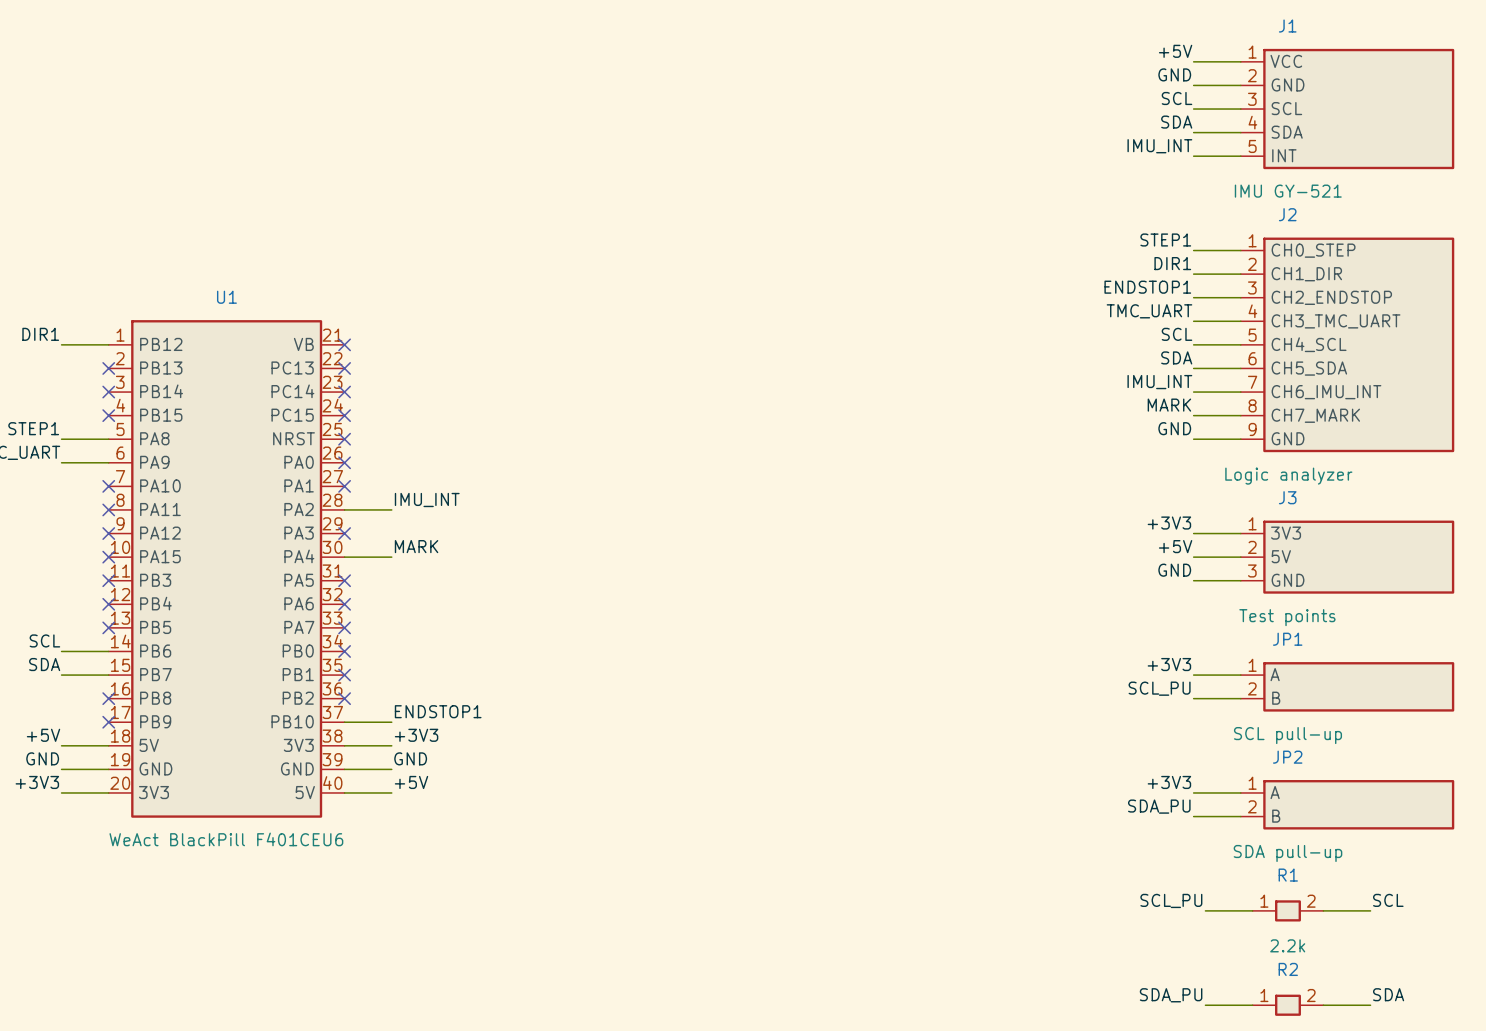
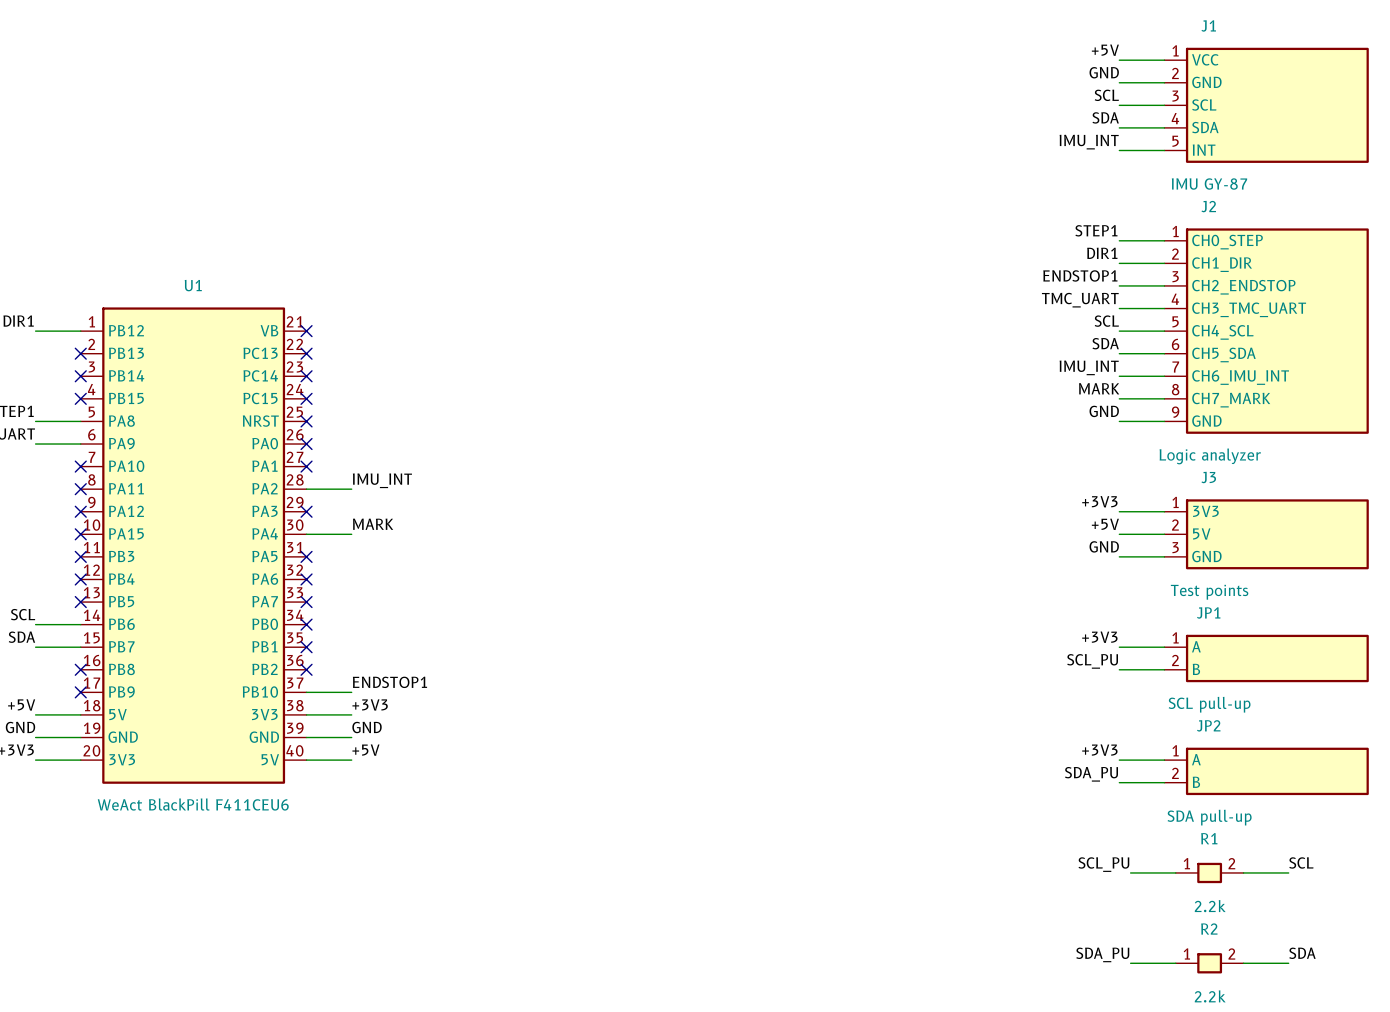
J1 value: IMU GY-521 (1288, 191) -> IMU GY-87 (1209, 184)
U1 value: WeAct BlackPill F401CEU6 (226, 839) -> WeAct BlackPill F411CEU6 (193, 804)

